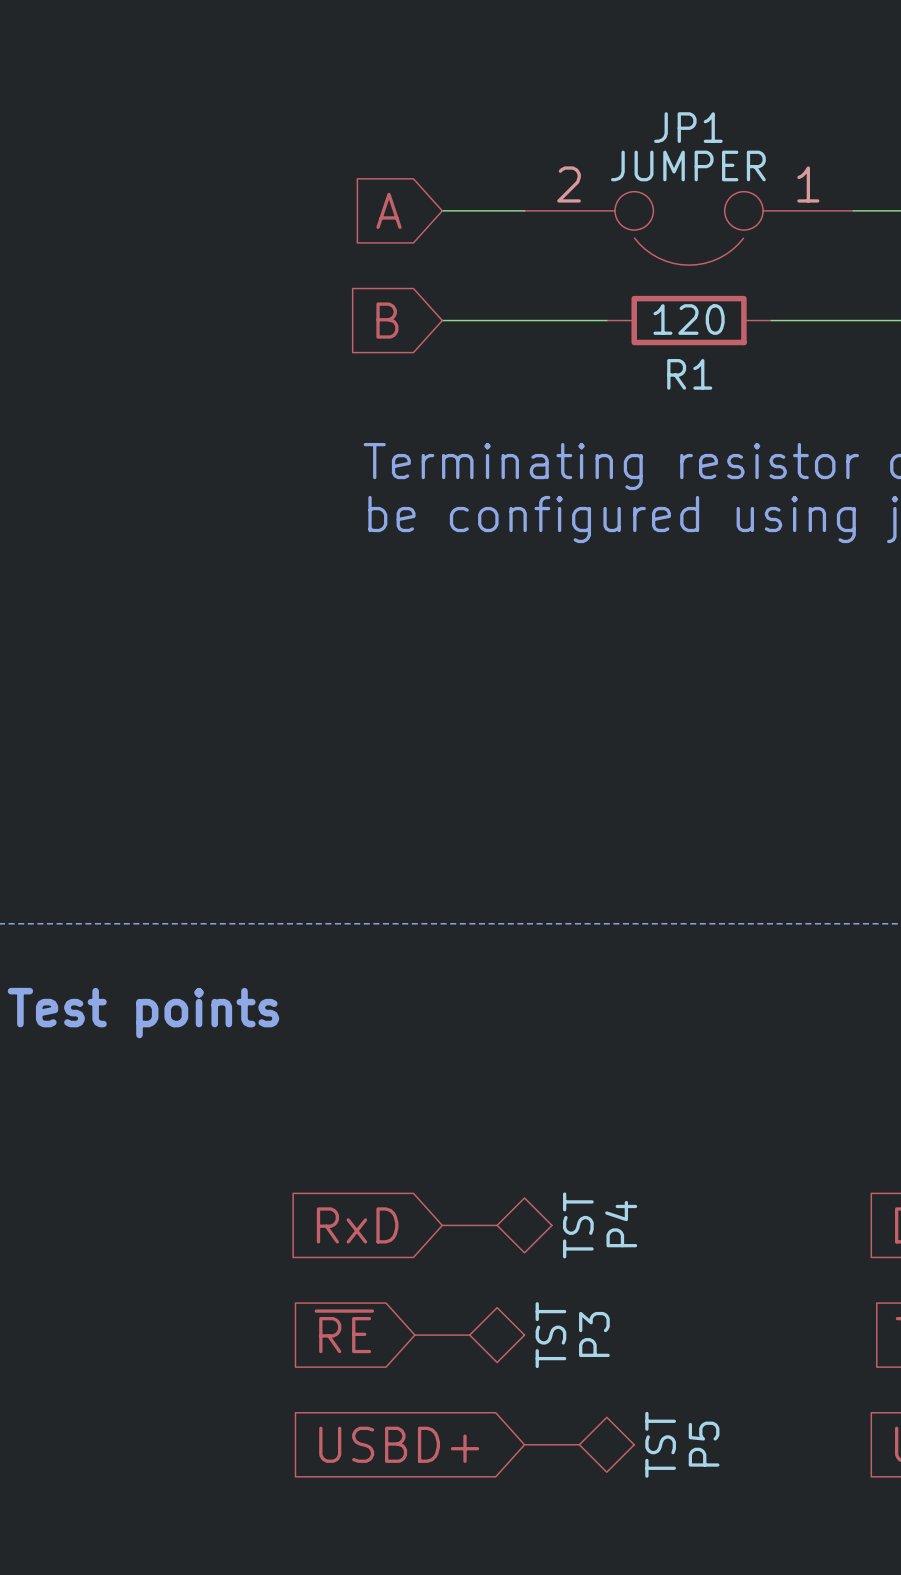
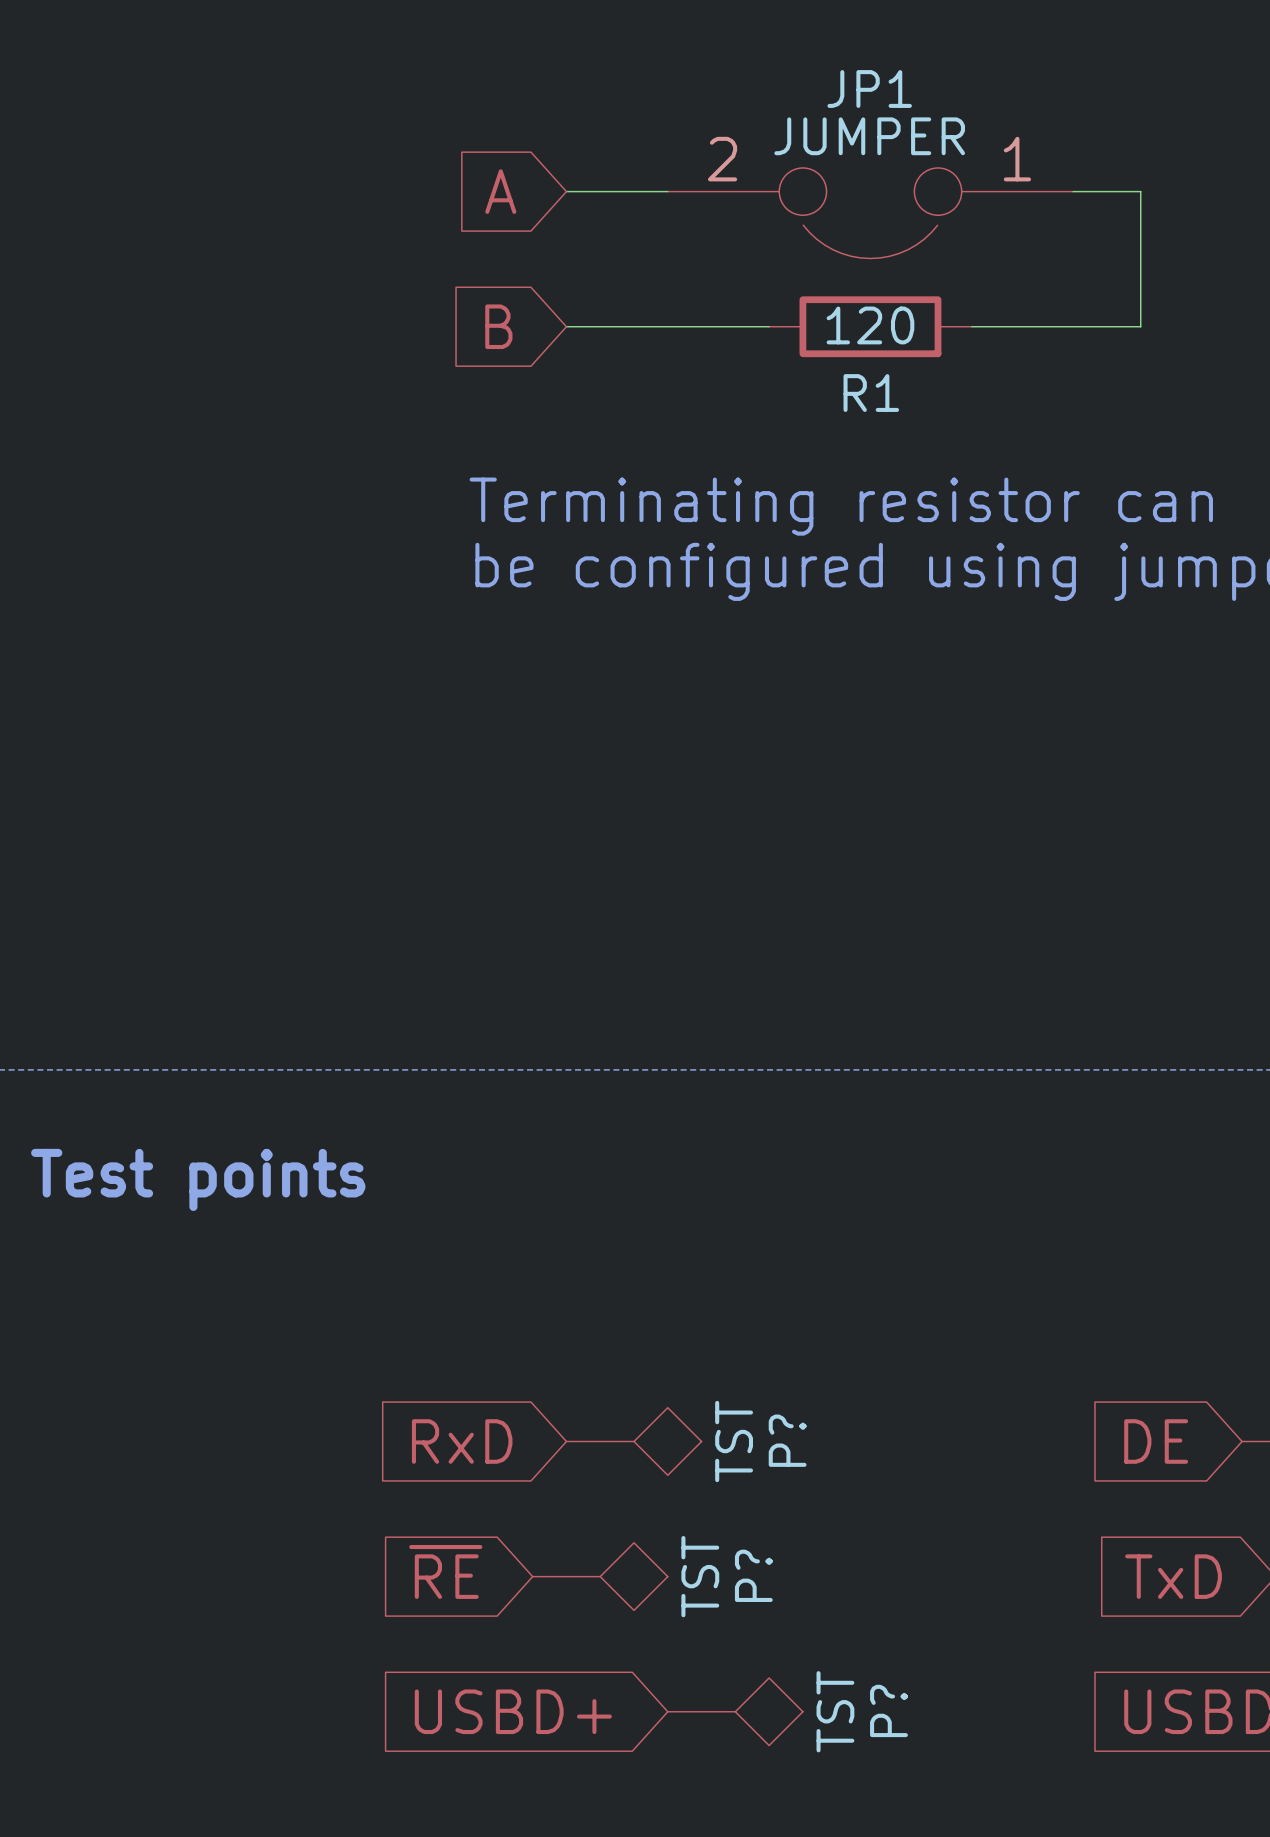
P4 name: P4 (621, 1224) -> P? (787, 1440)
P3 name: P3 (594, 1334) -> P? (753, 1575)
P5 name: P5 (704, 1444) -> P? (888, 1710)

